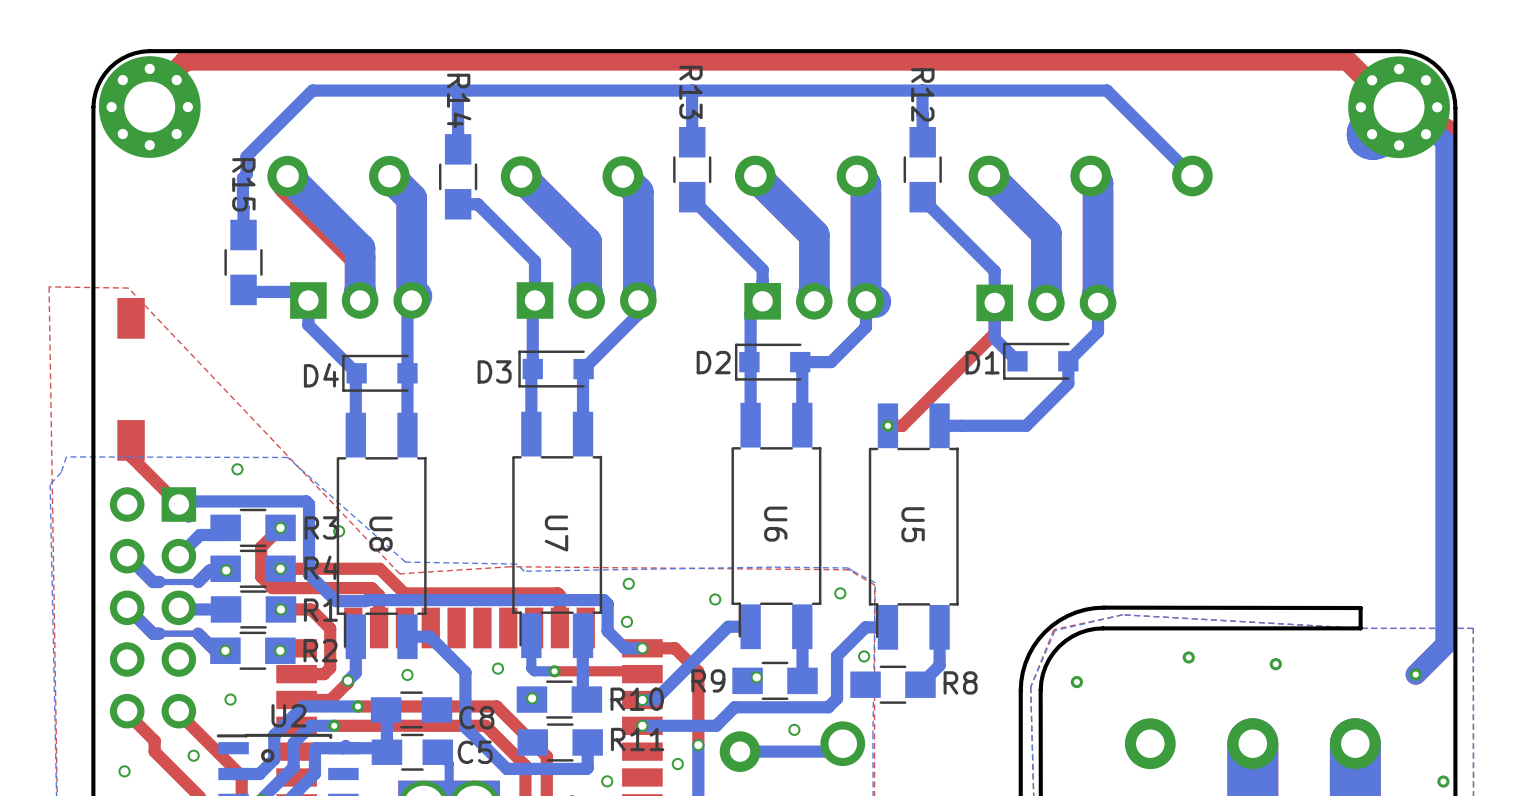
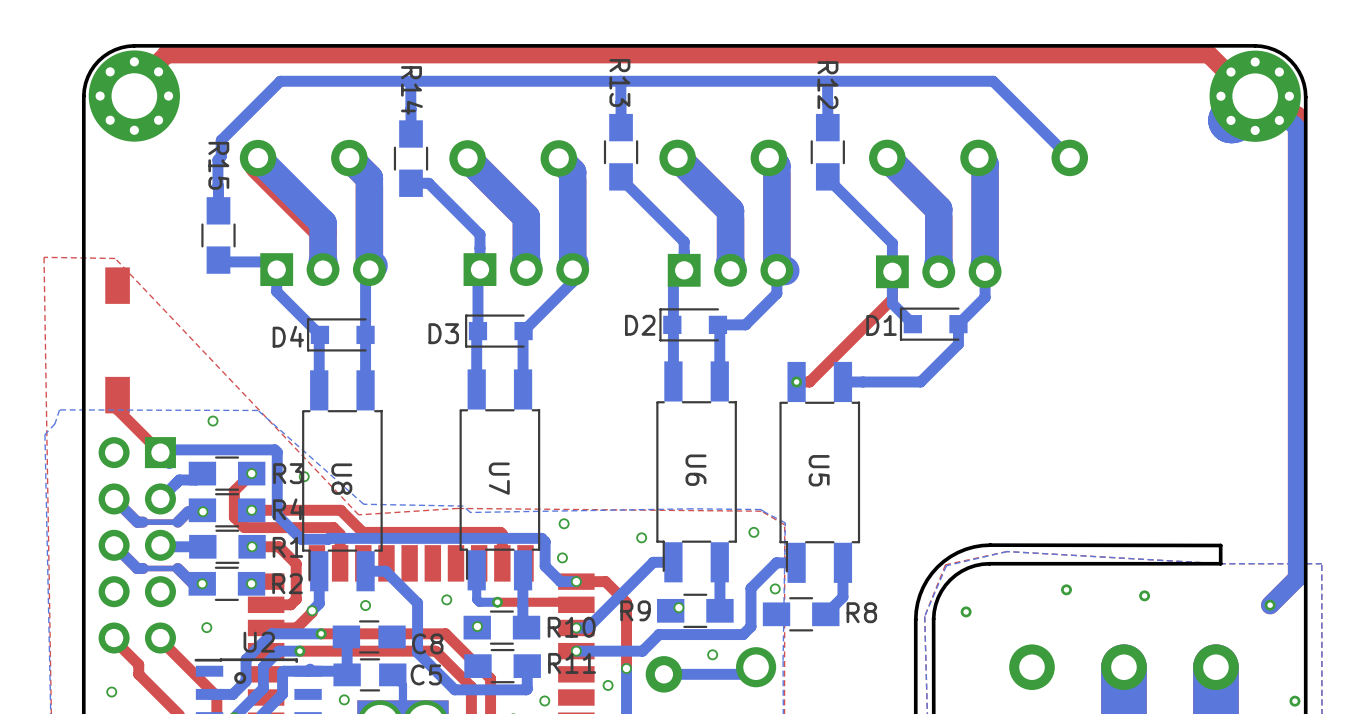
via: (193, 755) -> none
via: none -> (344, 699)

